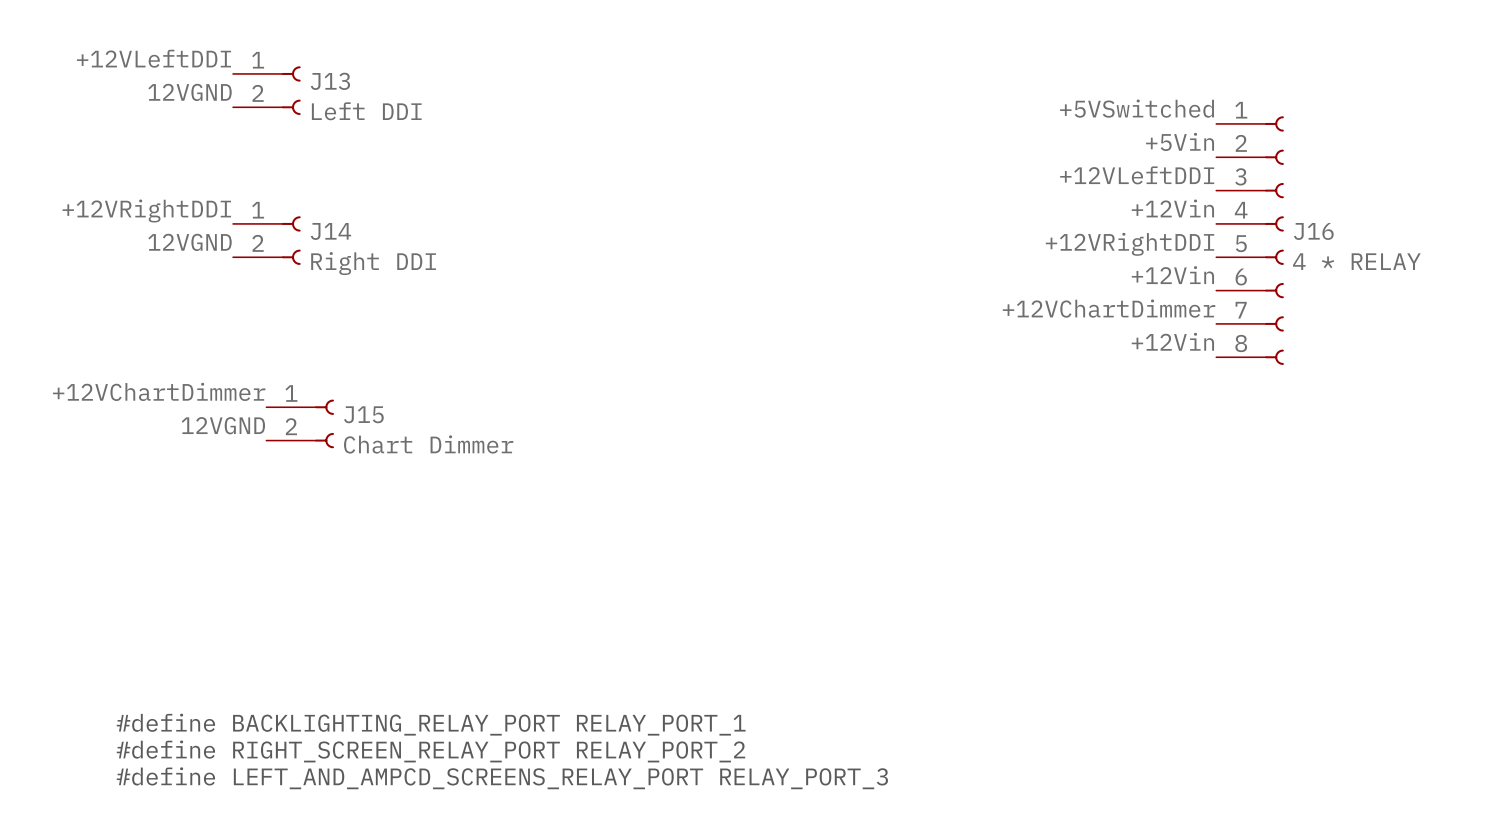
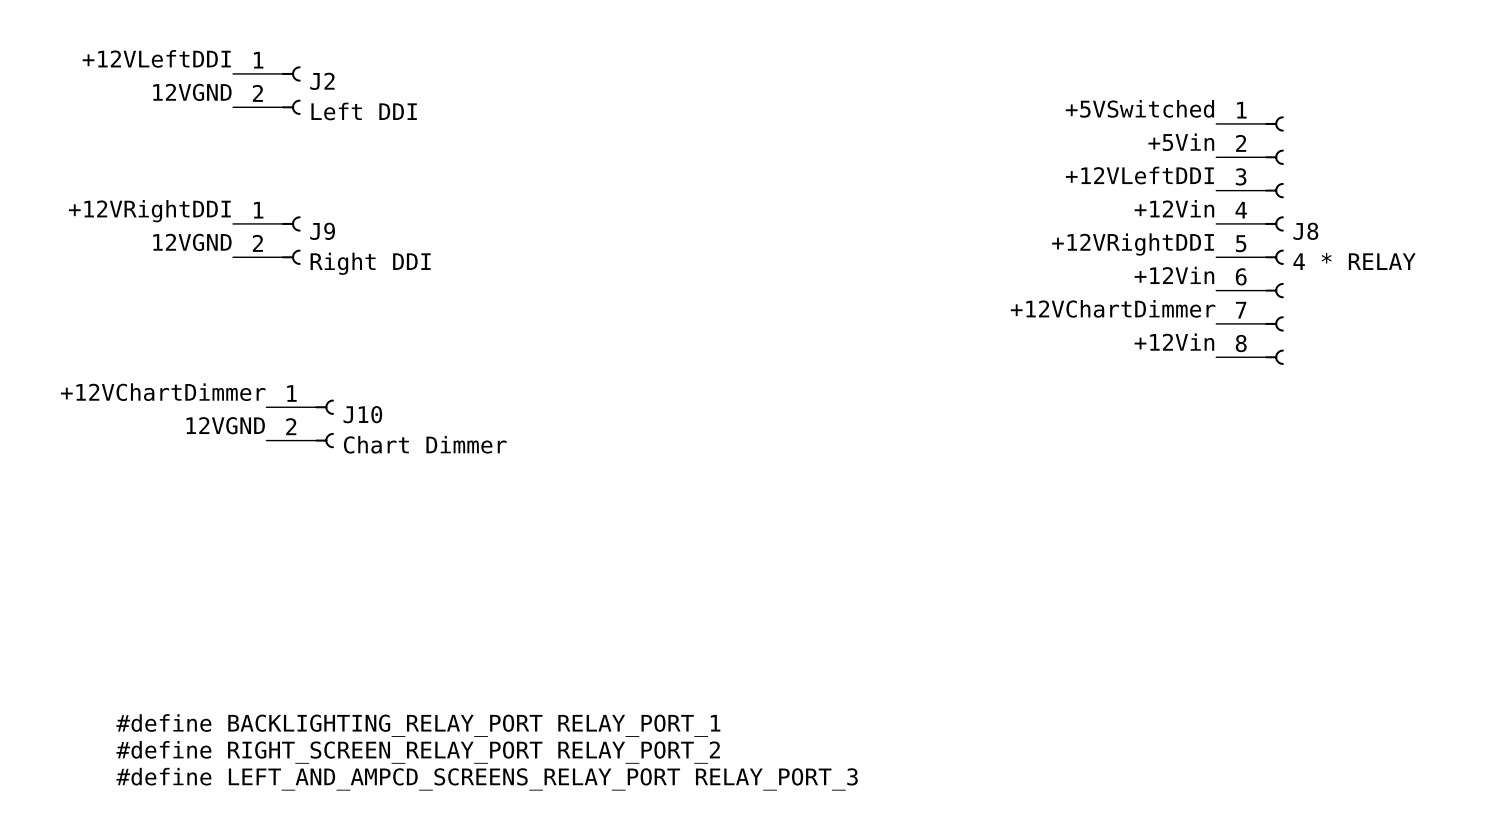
J13 name: J13 (330, 81) -> J2 (322, 81)
J14 name: J14 (330, 231) -> J9 (322, 231)
J16 name: J16 (1313, 231) -> J8 (1305, 231)
J15 name: J15 (363, 414) -> J10 (362, 414)

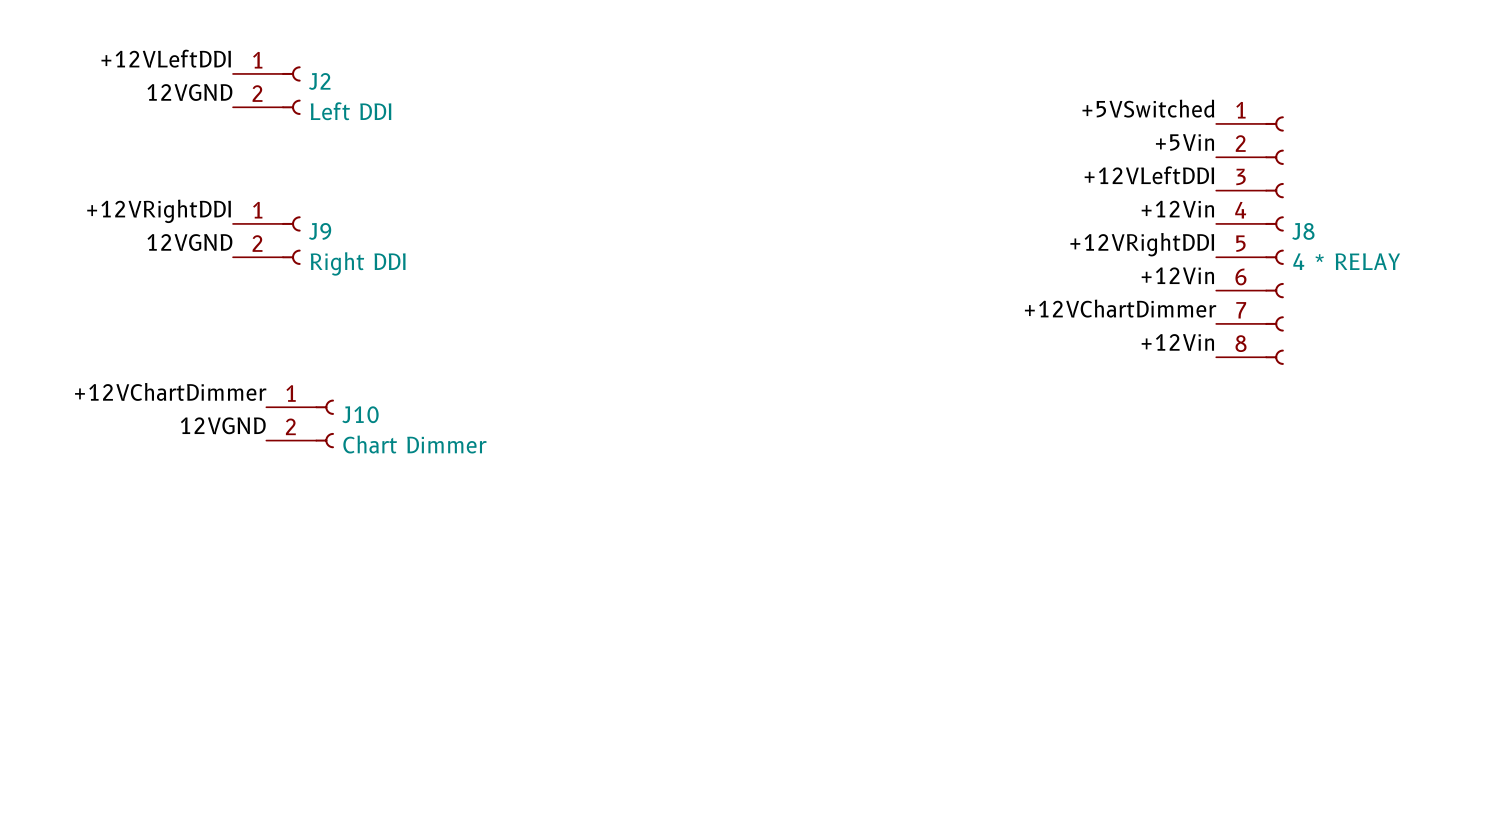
text: #define BACKLIGHTING_RELAY_PORT RELAY_PORT_1 (418, 725) -> none
text: #define RIGHT_SCREEN_RELAY_PORT RELAY_PORT_2 (418, 752) -> none
text: #define LEFT_AND_AMPCD_SCREENS_RELAY_PORT RELAY_PORT_3 (487, 779) -> none

